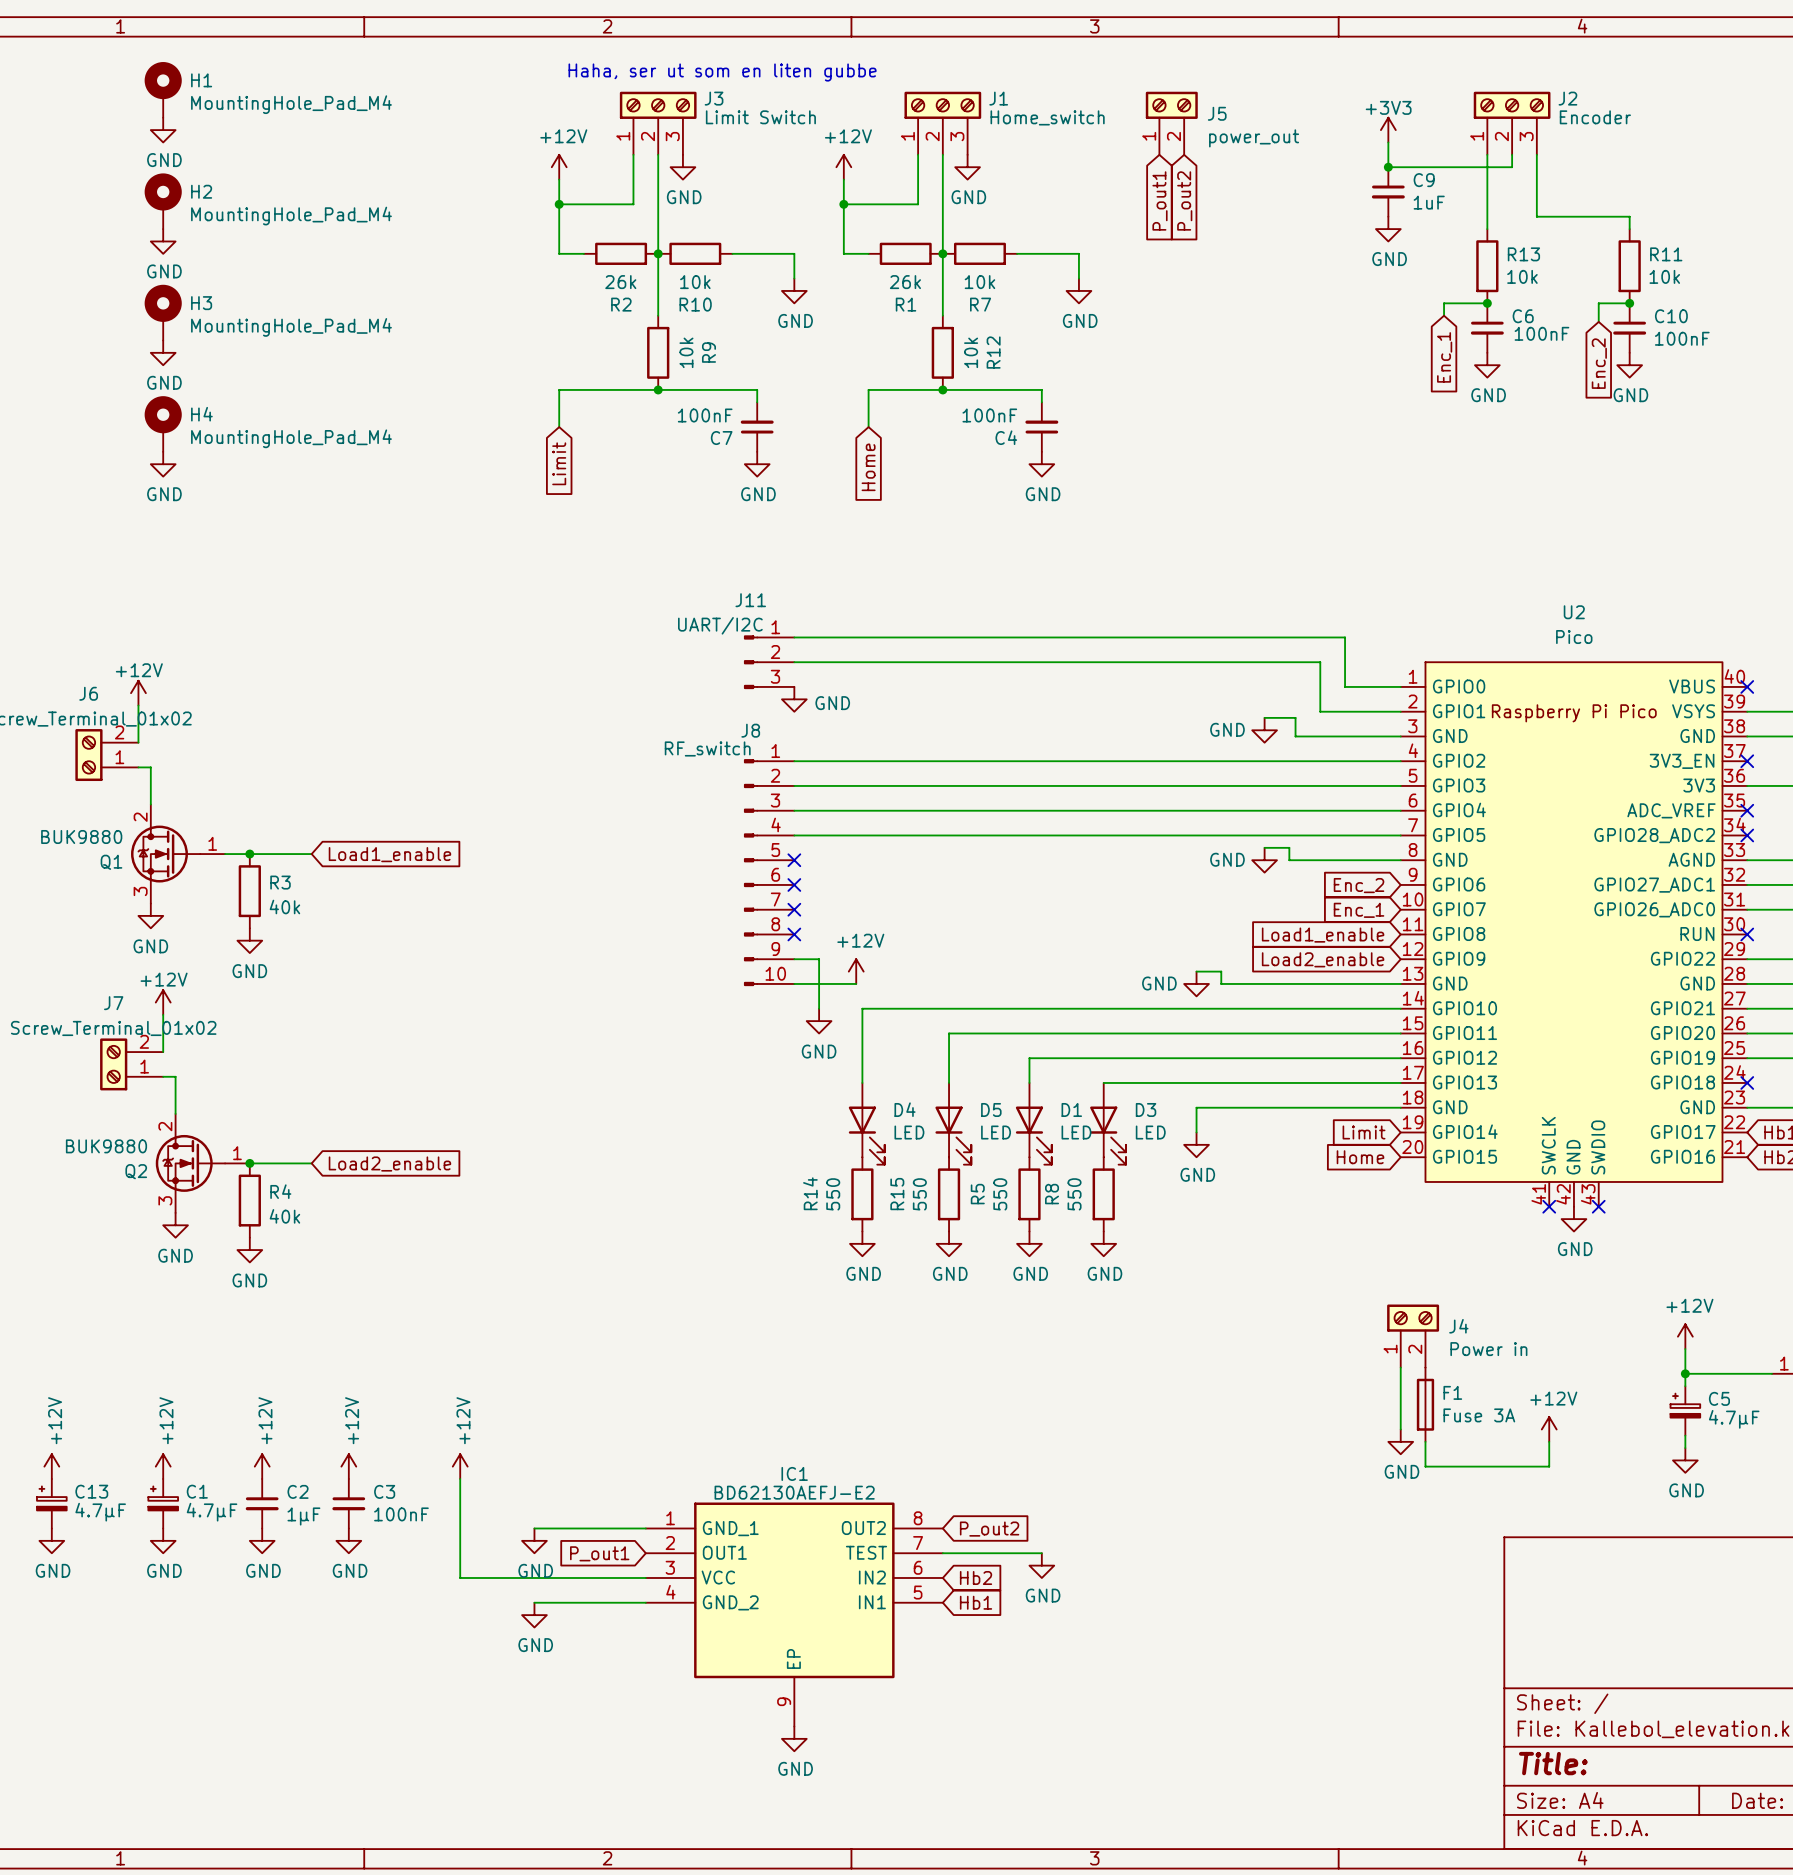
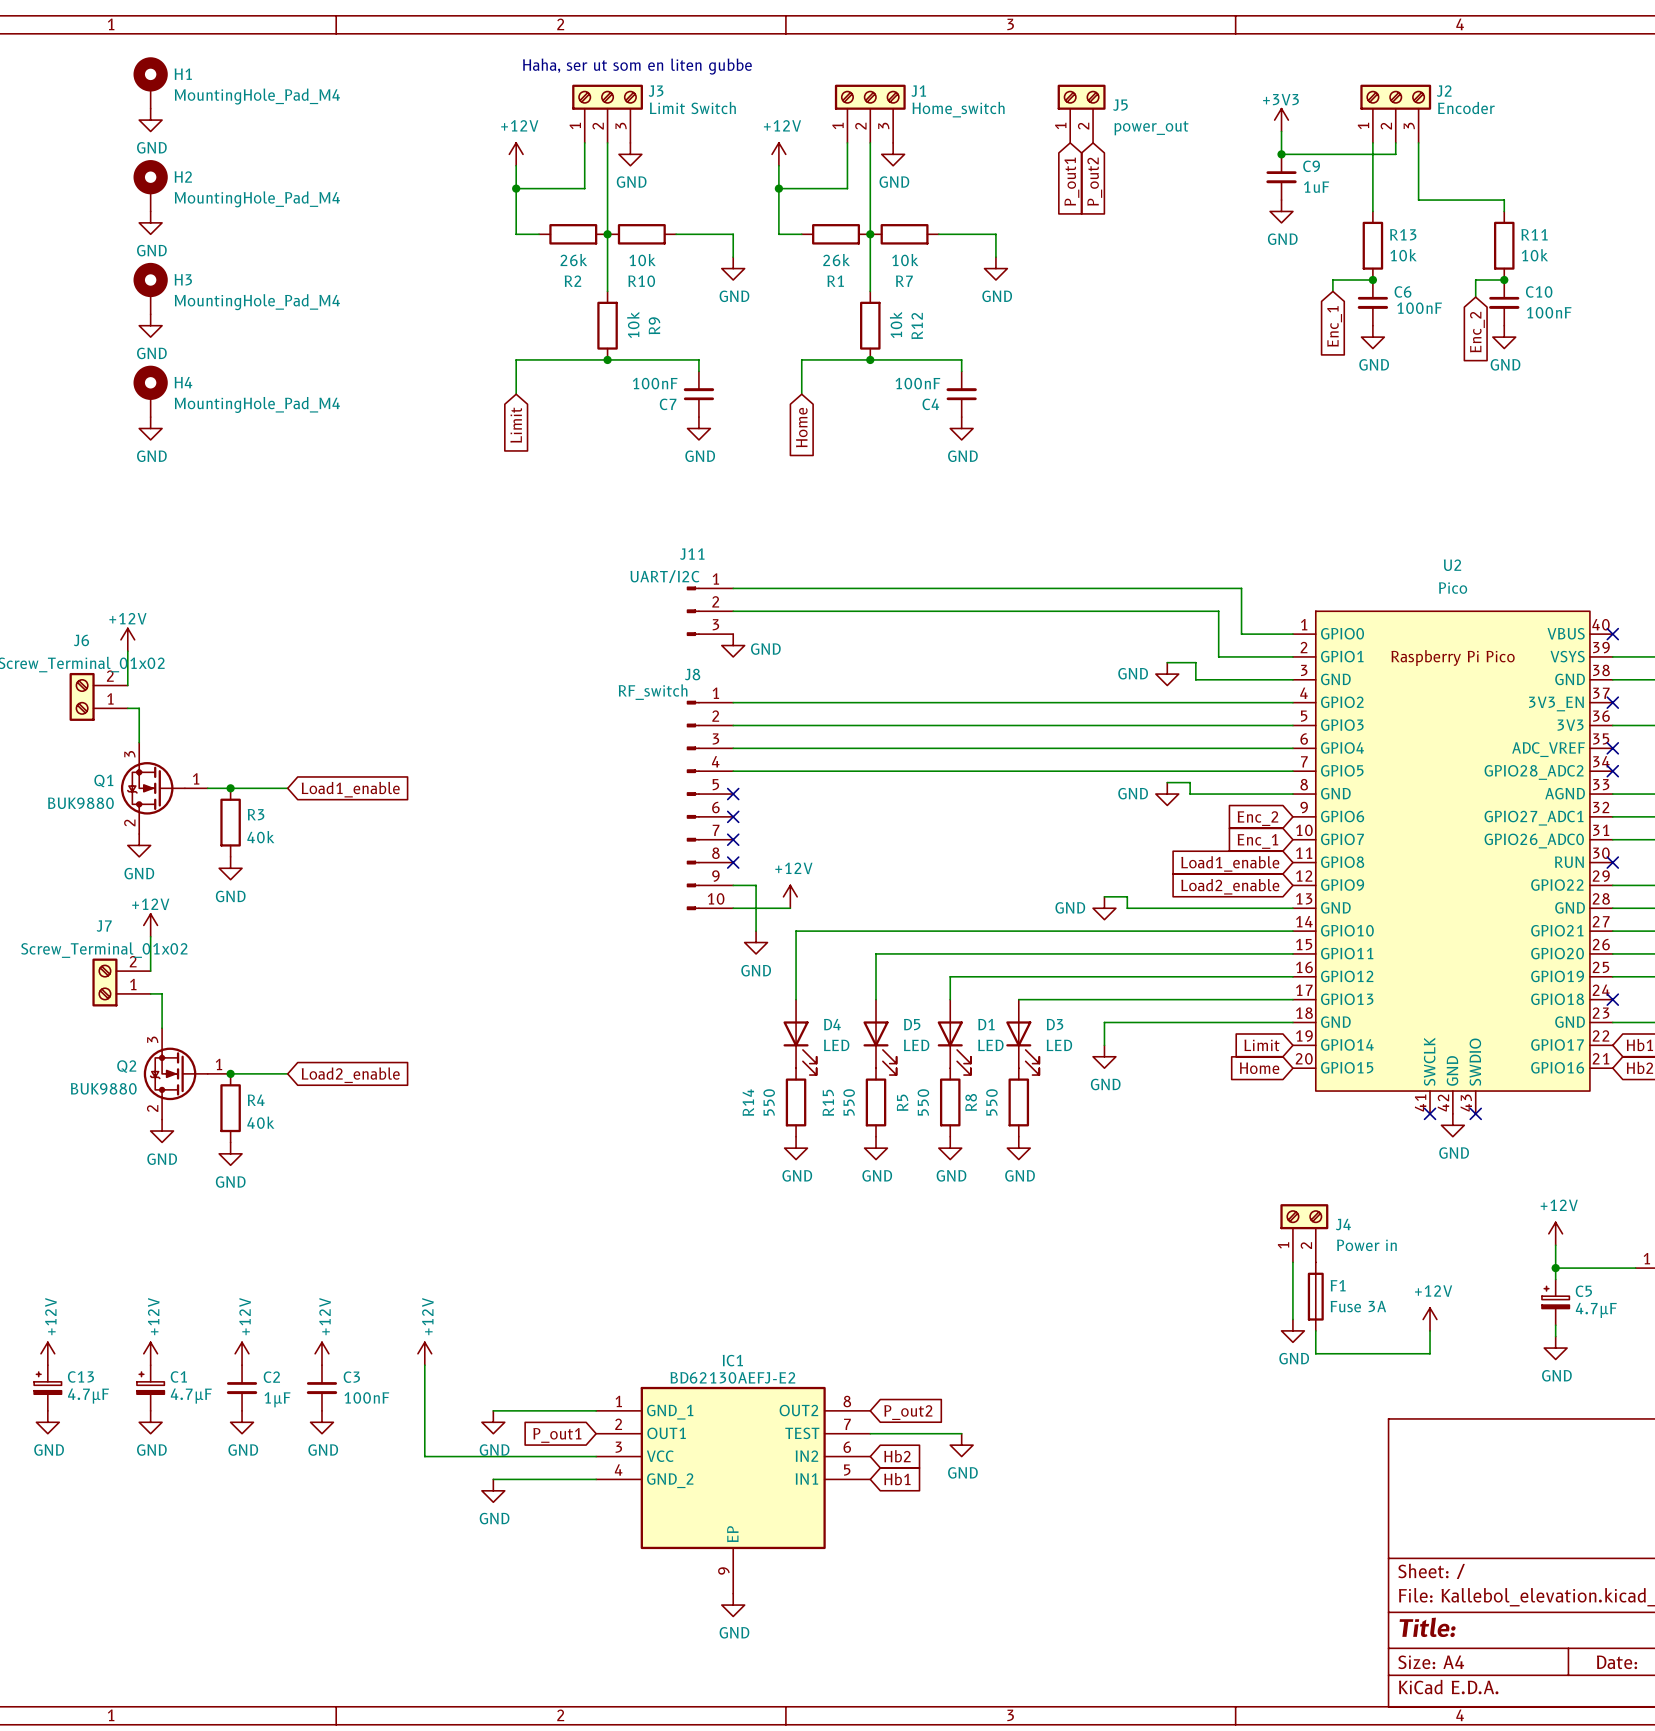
Q1 flip: as is (165, 854) -> up-down (152, 788)
Q2 flip: as is (190, 1163) -> up-down (175, 1073)

